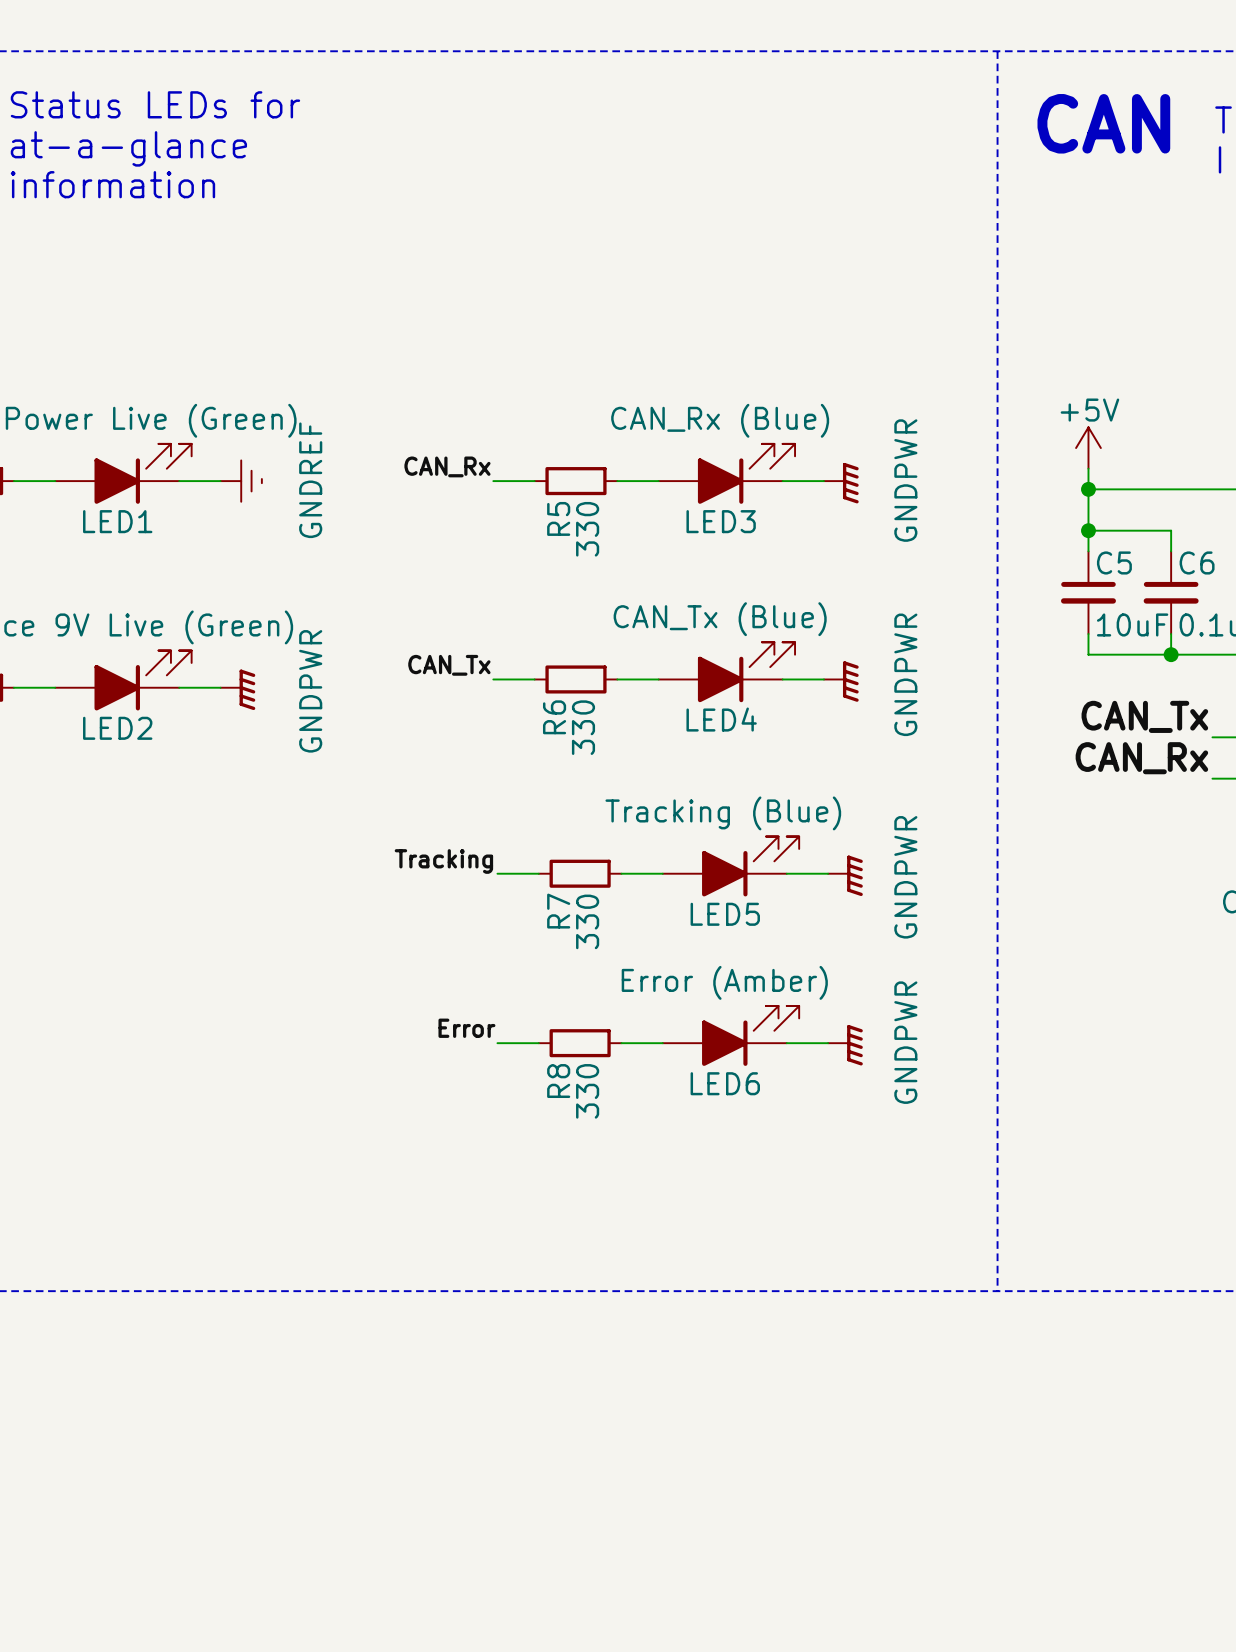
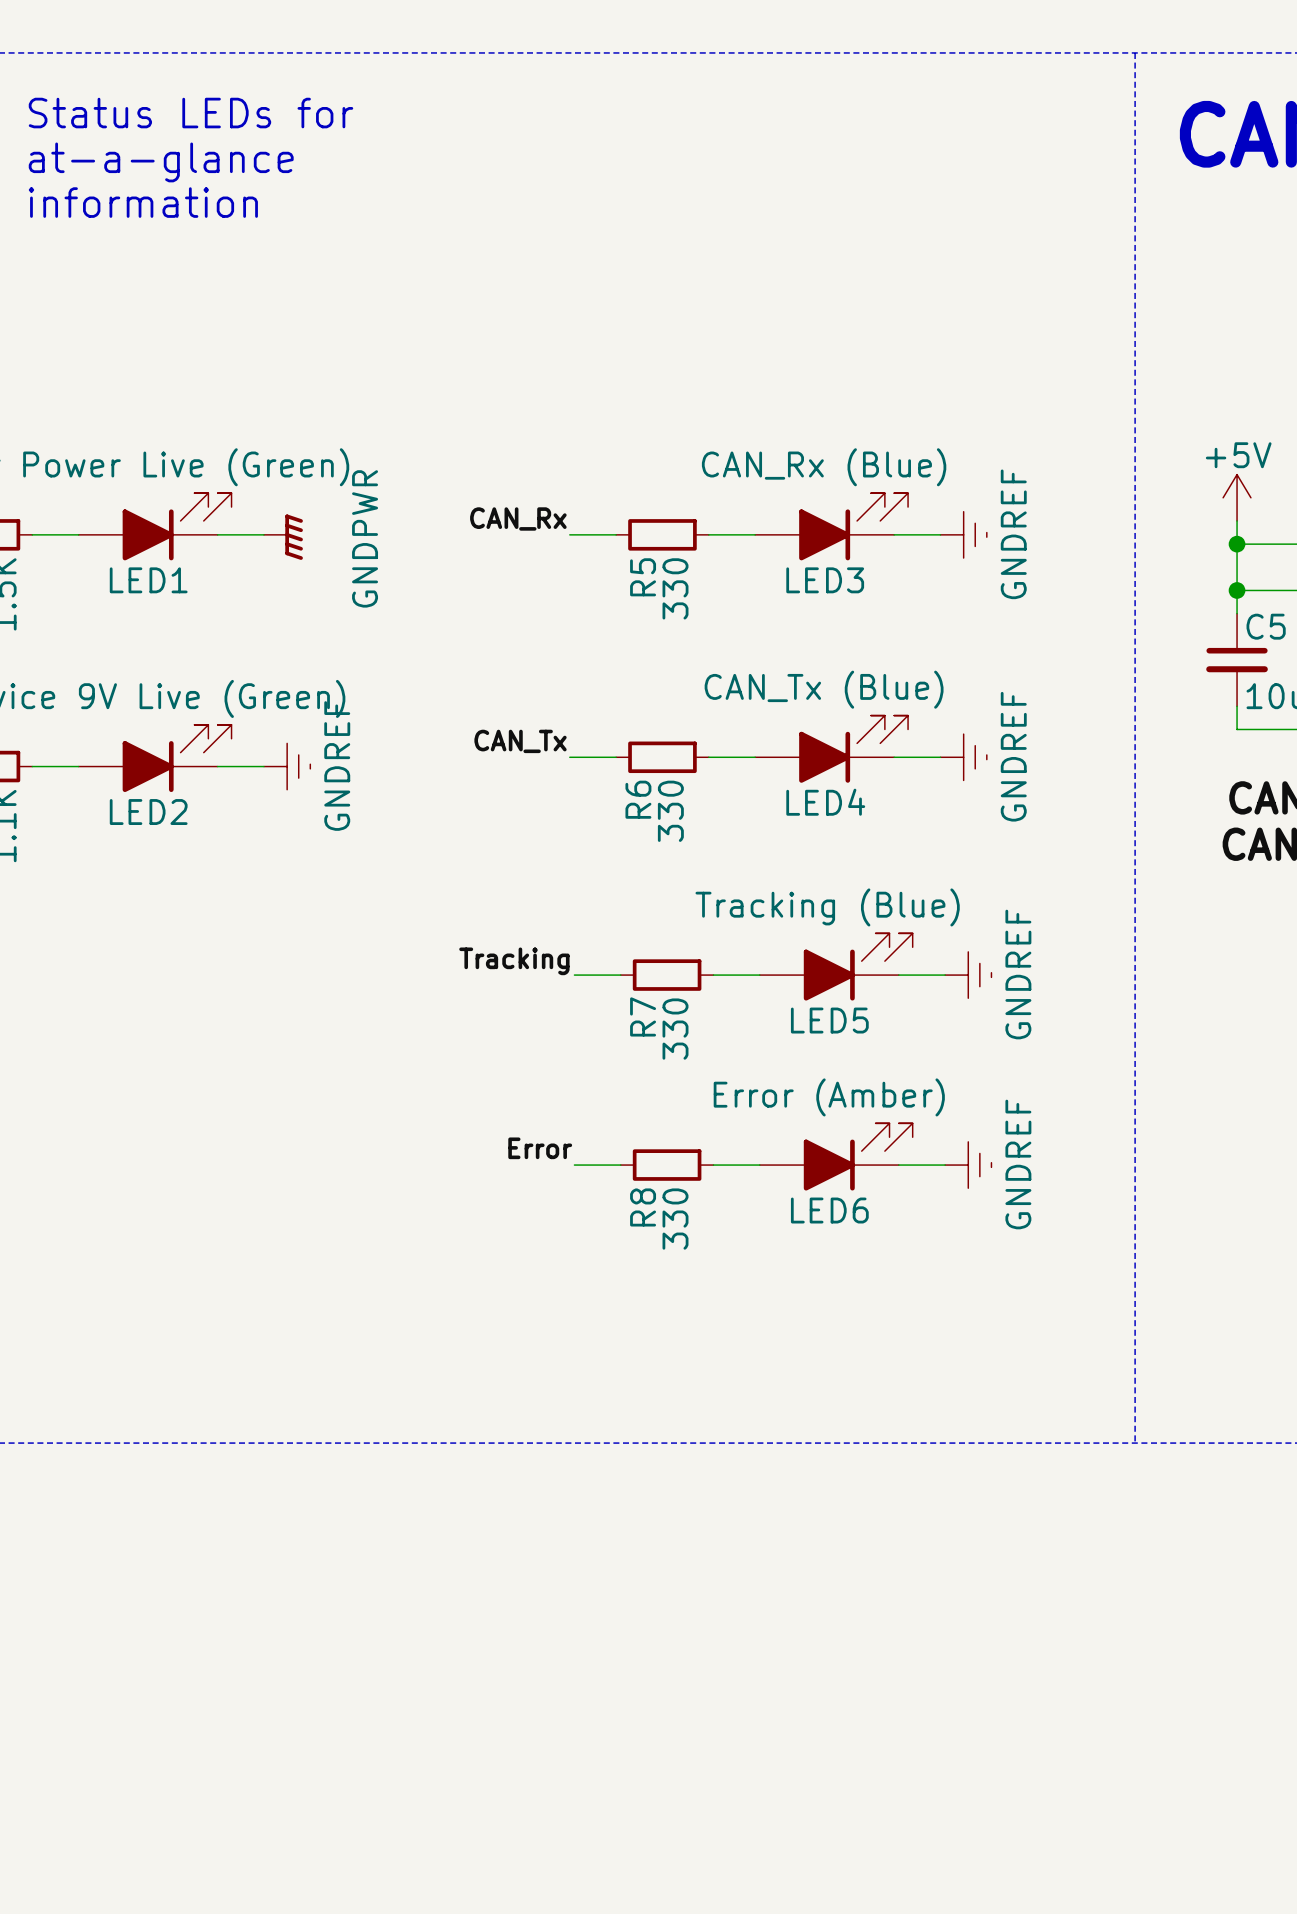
power symbol: GNDREF (241, 481) -> GNDPWR (283, 537)
power symbol: GNDPWR (841, 483) -> GNDREF (963, 534)
power symbol: GNDPWR (841, 681) -> GNDREF (963, 757)
power symbol: GNDPWR (237, 689) -> GNDREF (287, 766)
power symbol: GNDPWR (845, 875) -> GNDREF (968, 975)
power symbol: GNDPWR (845, 1045) -> GNDREF (968, 1165)

